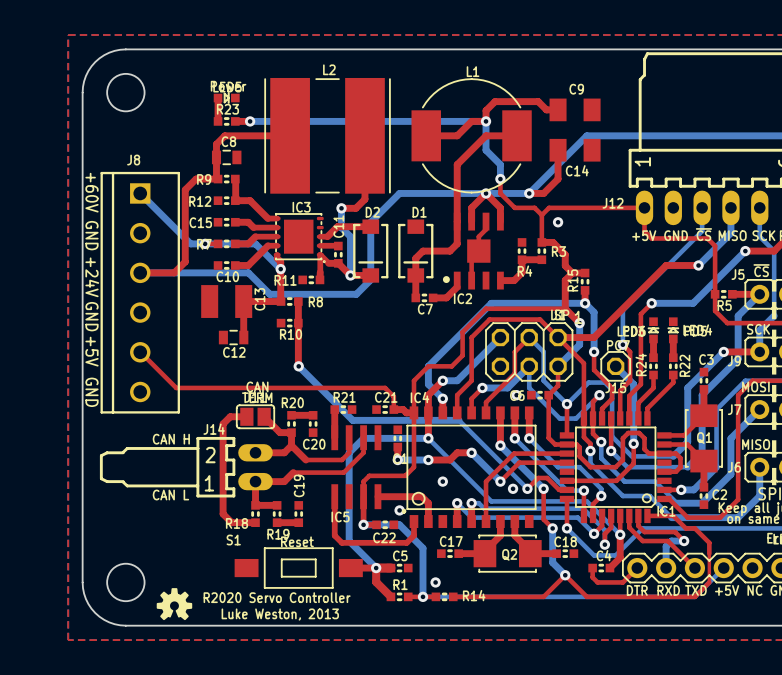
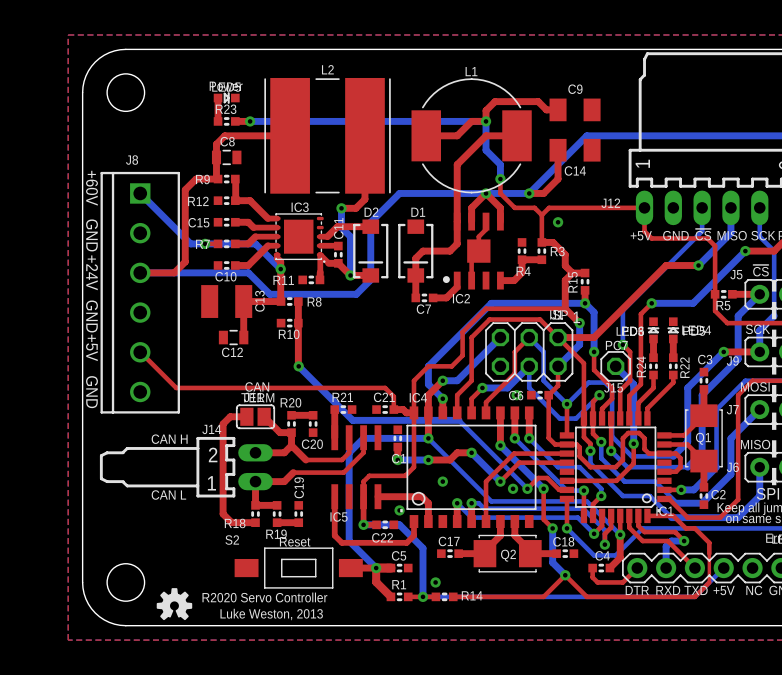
S1 name: S1 (233, 540) -> S2 (232, 540)

